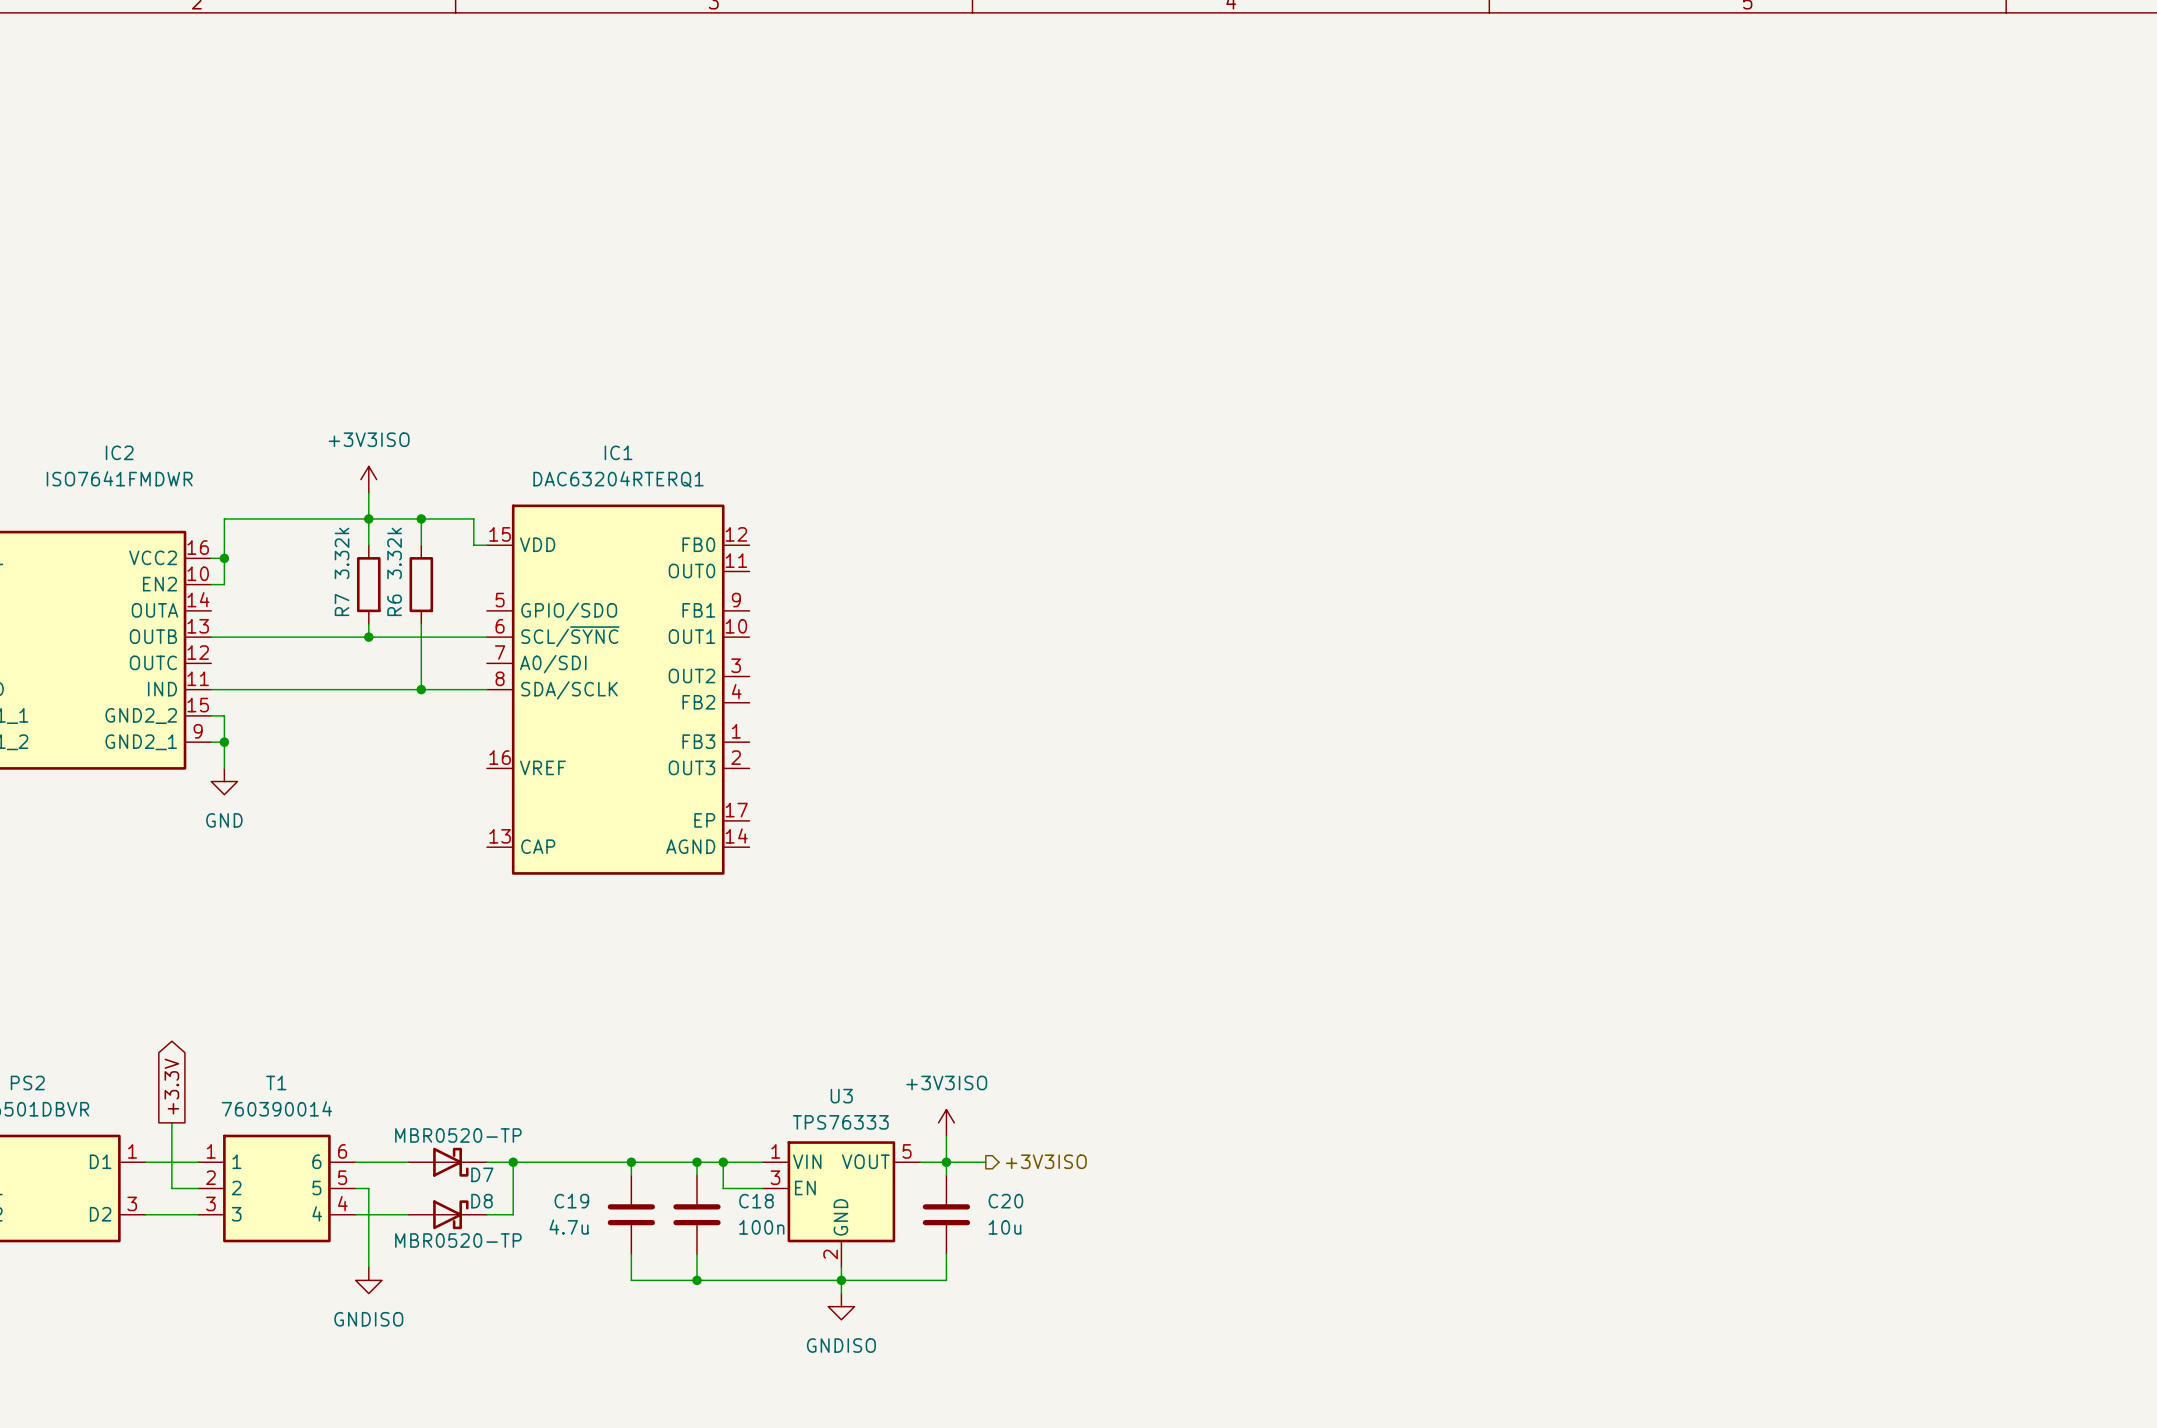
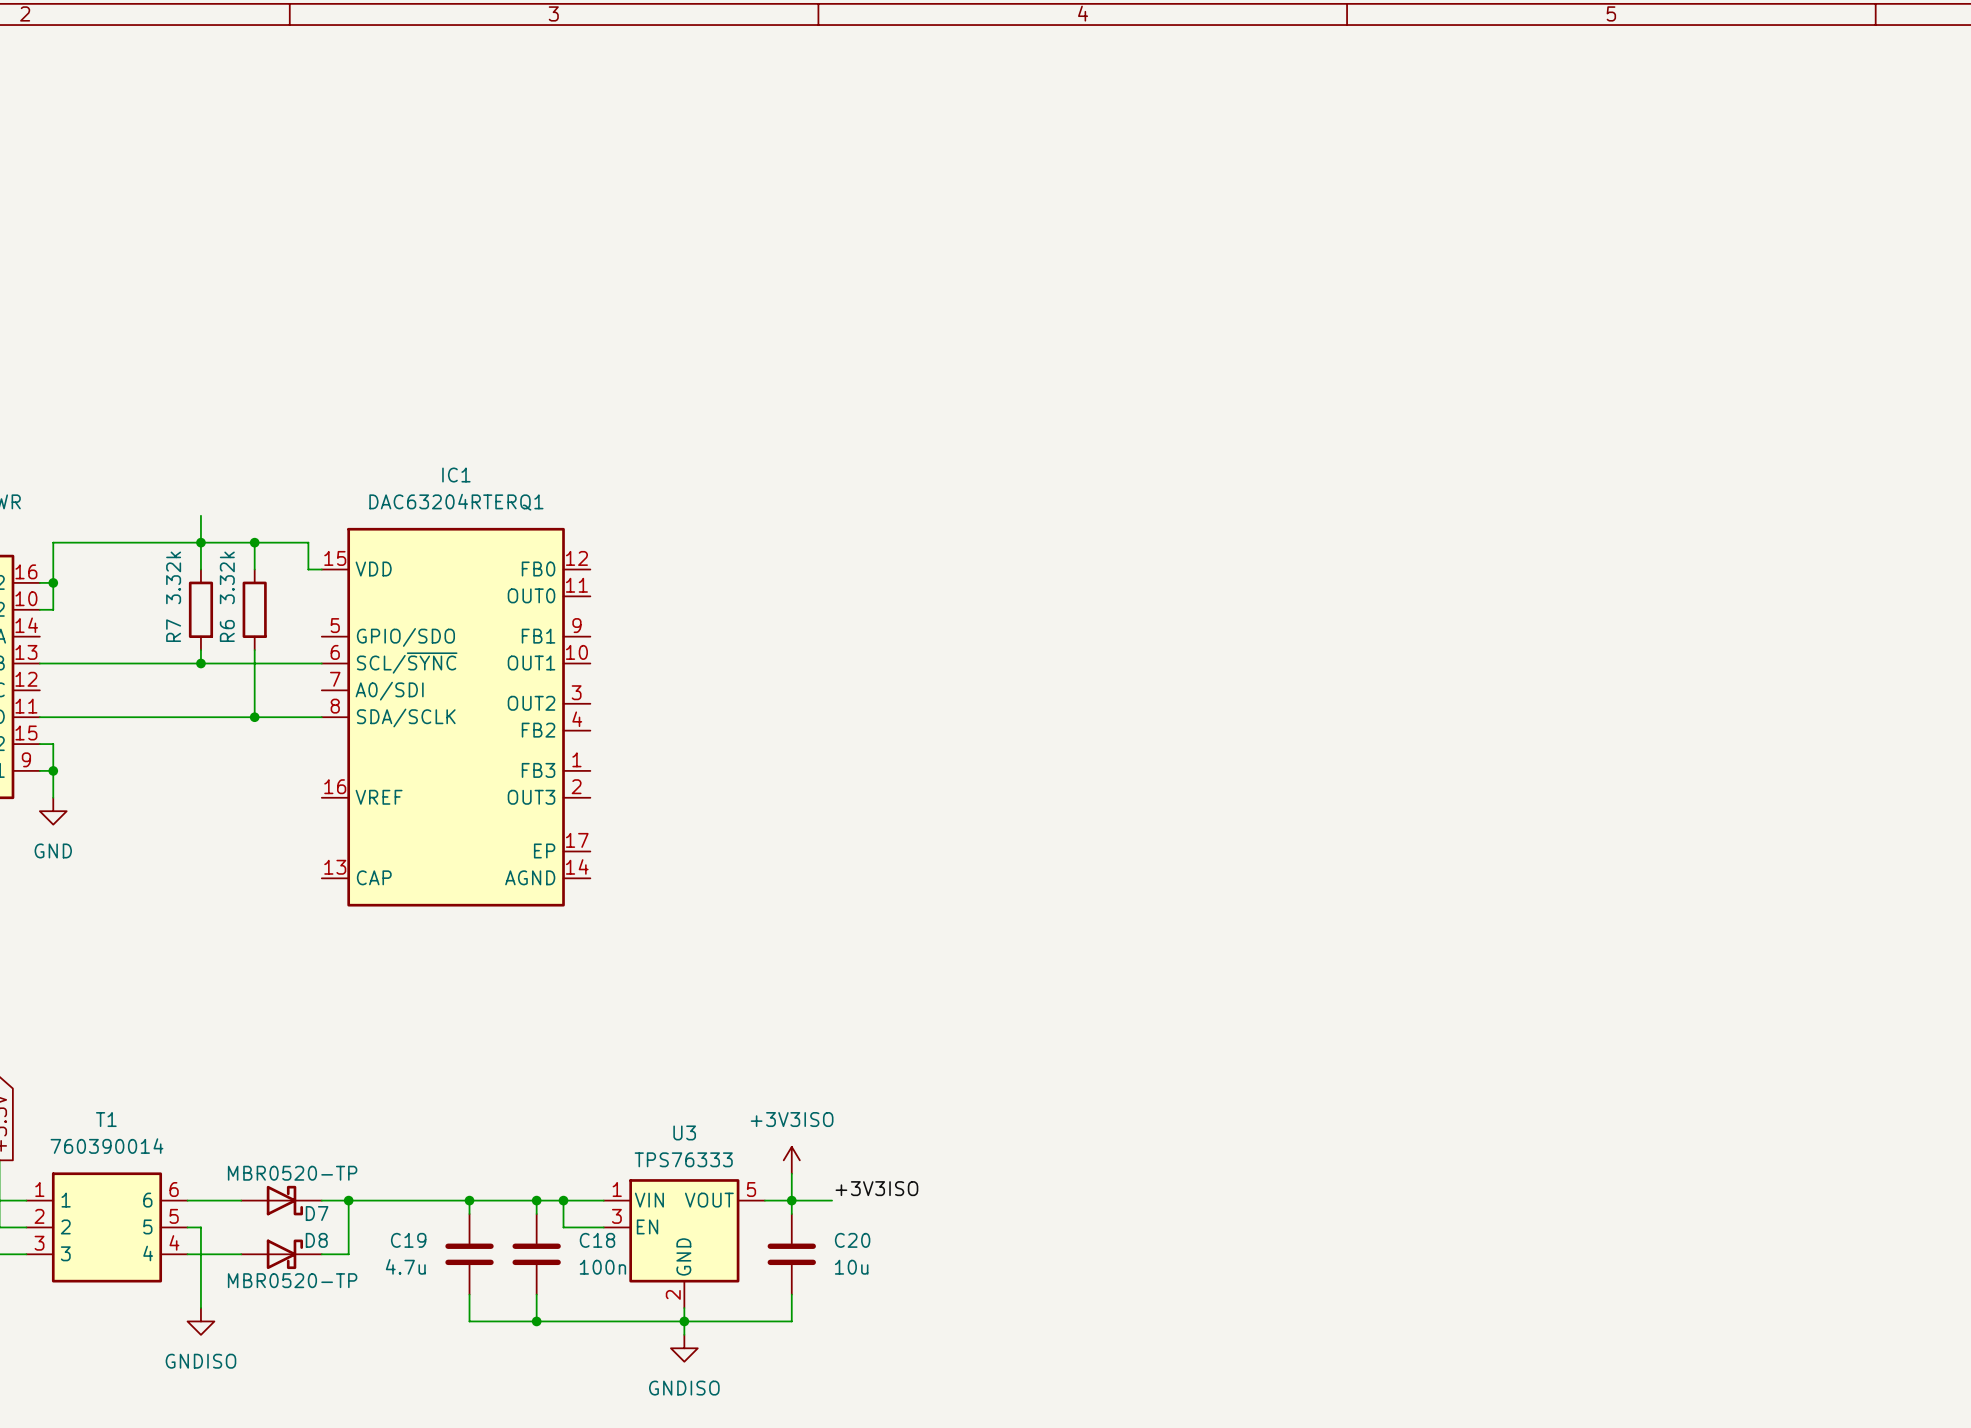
power symbol: +3V3ISO (368, 479) -> none
label: none -> +3V3ISO (876, 1188)
hierarchical label: +3V3ISO (1046, 1161) -> none

